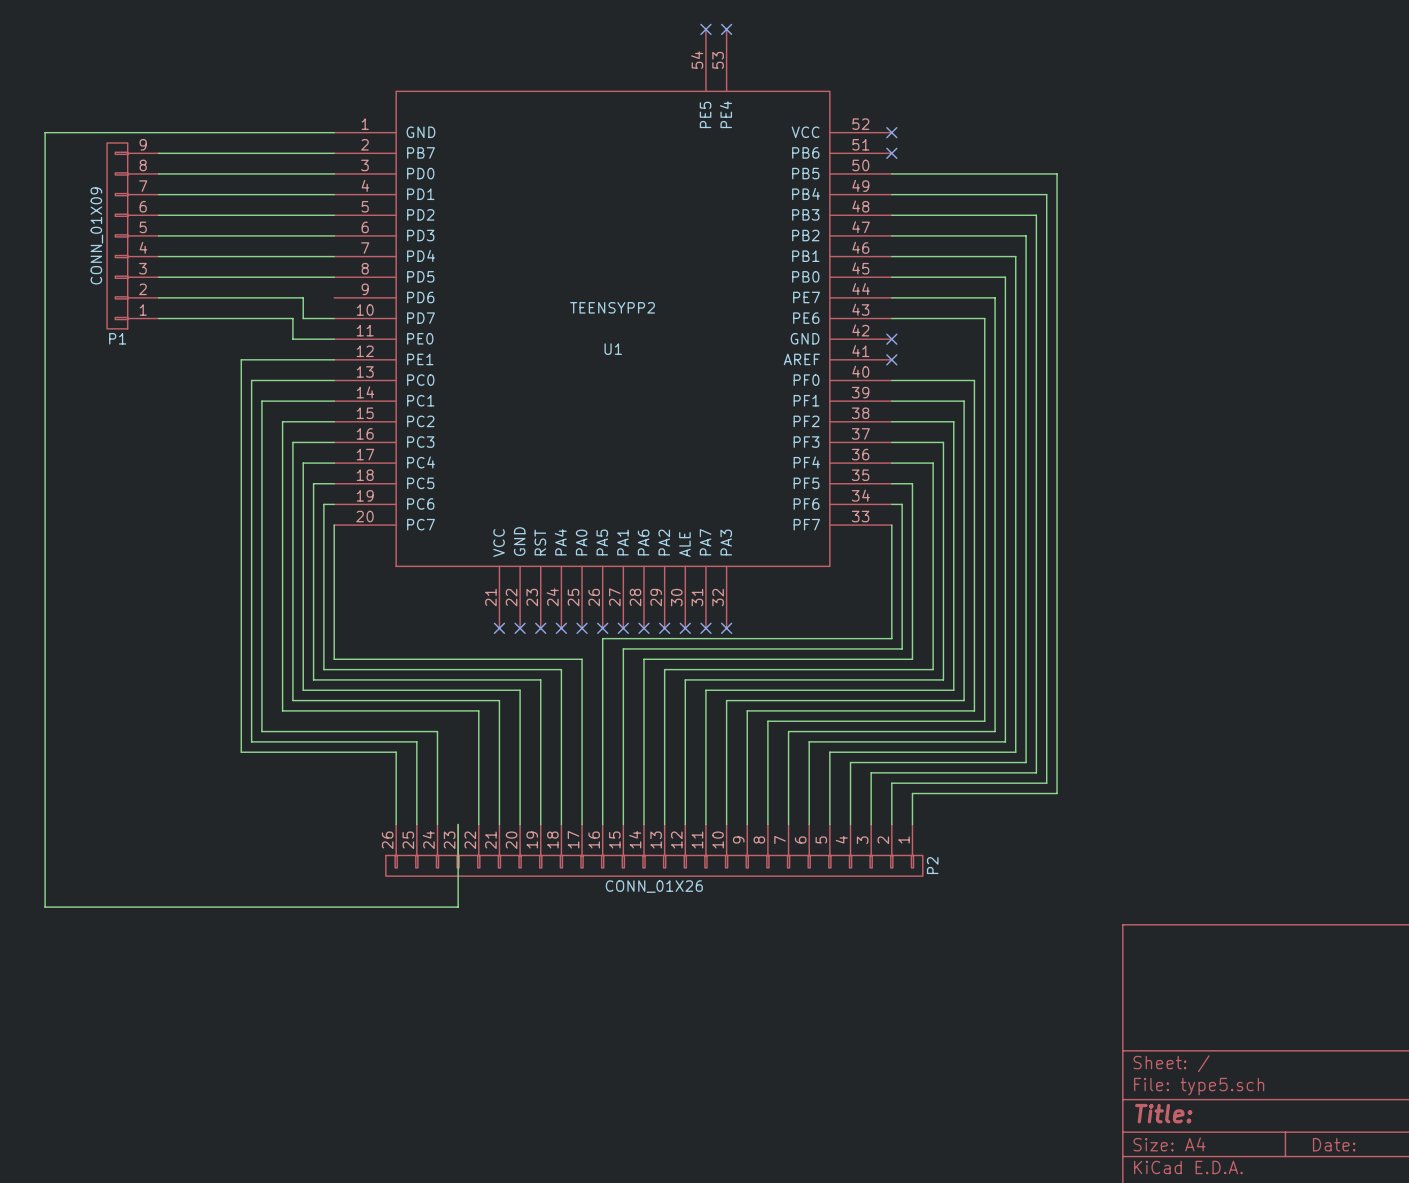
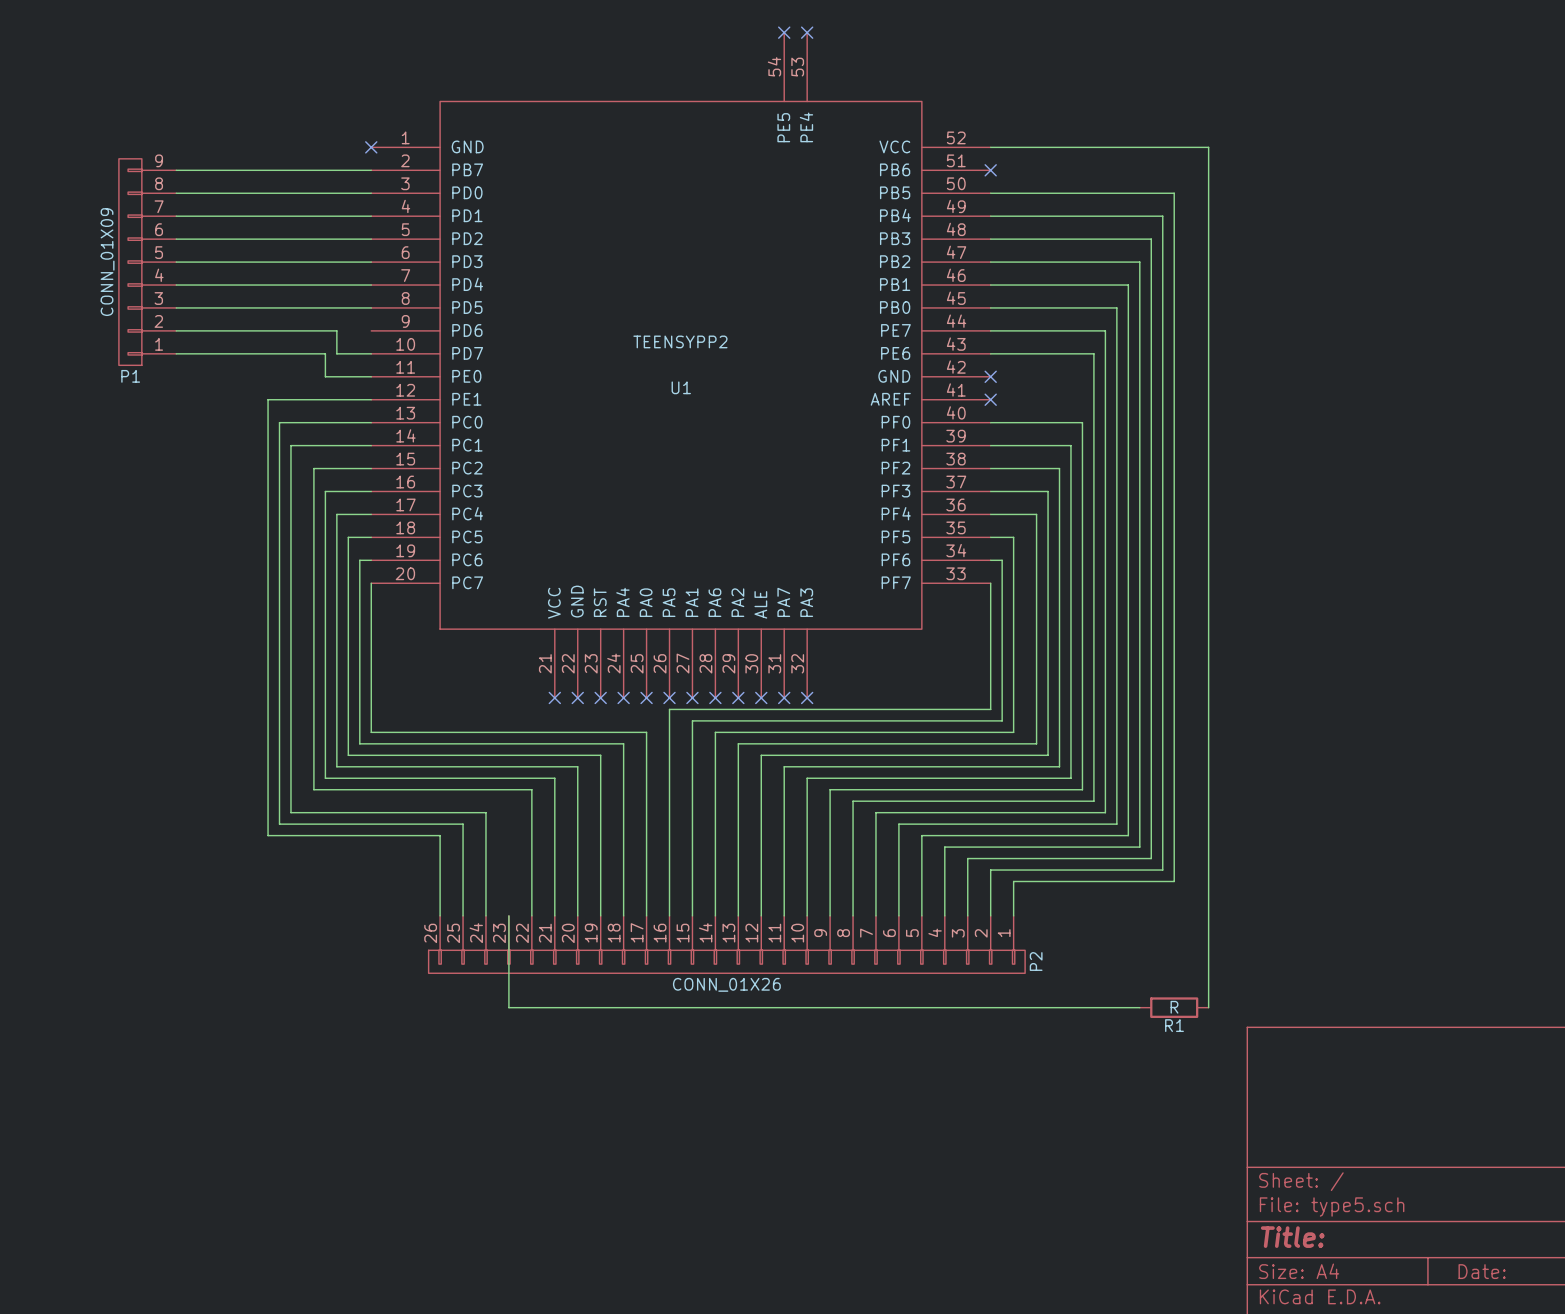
wire: (334, 132) (45, 132) (45, 907) (458, 907) -> (1139, 1007) (508, 1007)
no-connect mark: none -> (371, 147)
wire: none -> (990, 147) (1208, 147) (1208, 1007)
no-connect mark: (891, 132) -> none
R1: none -> R (1174, 1007)

